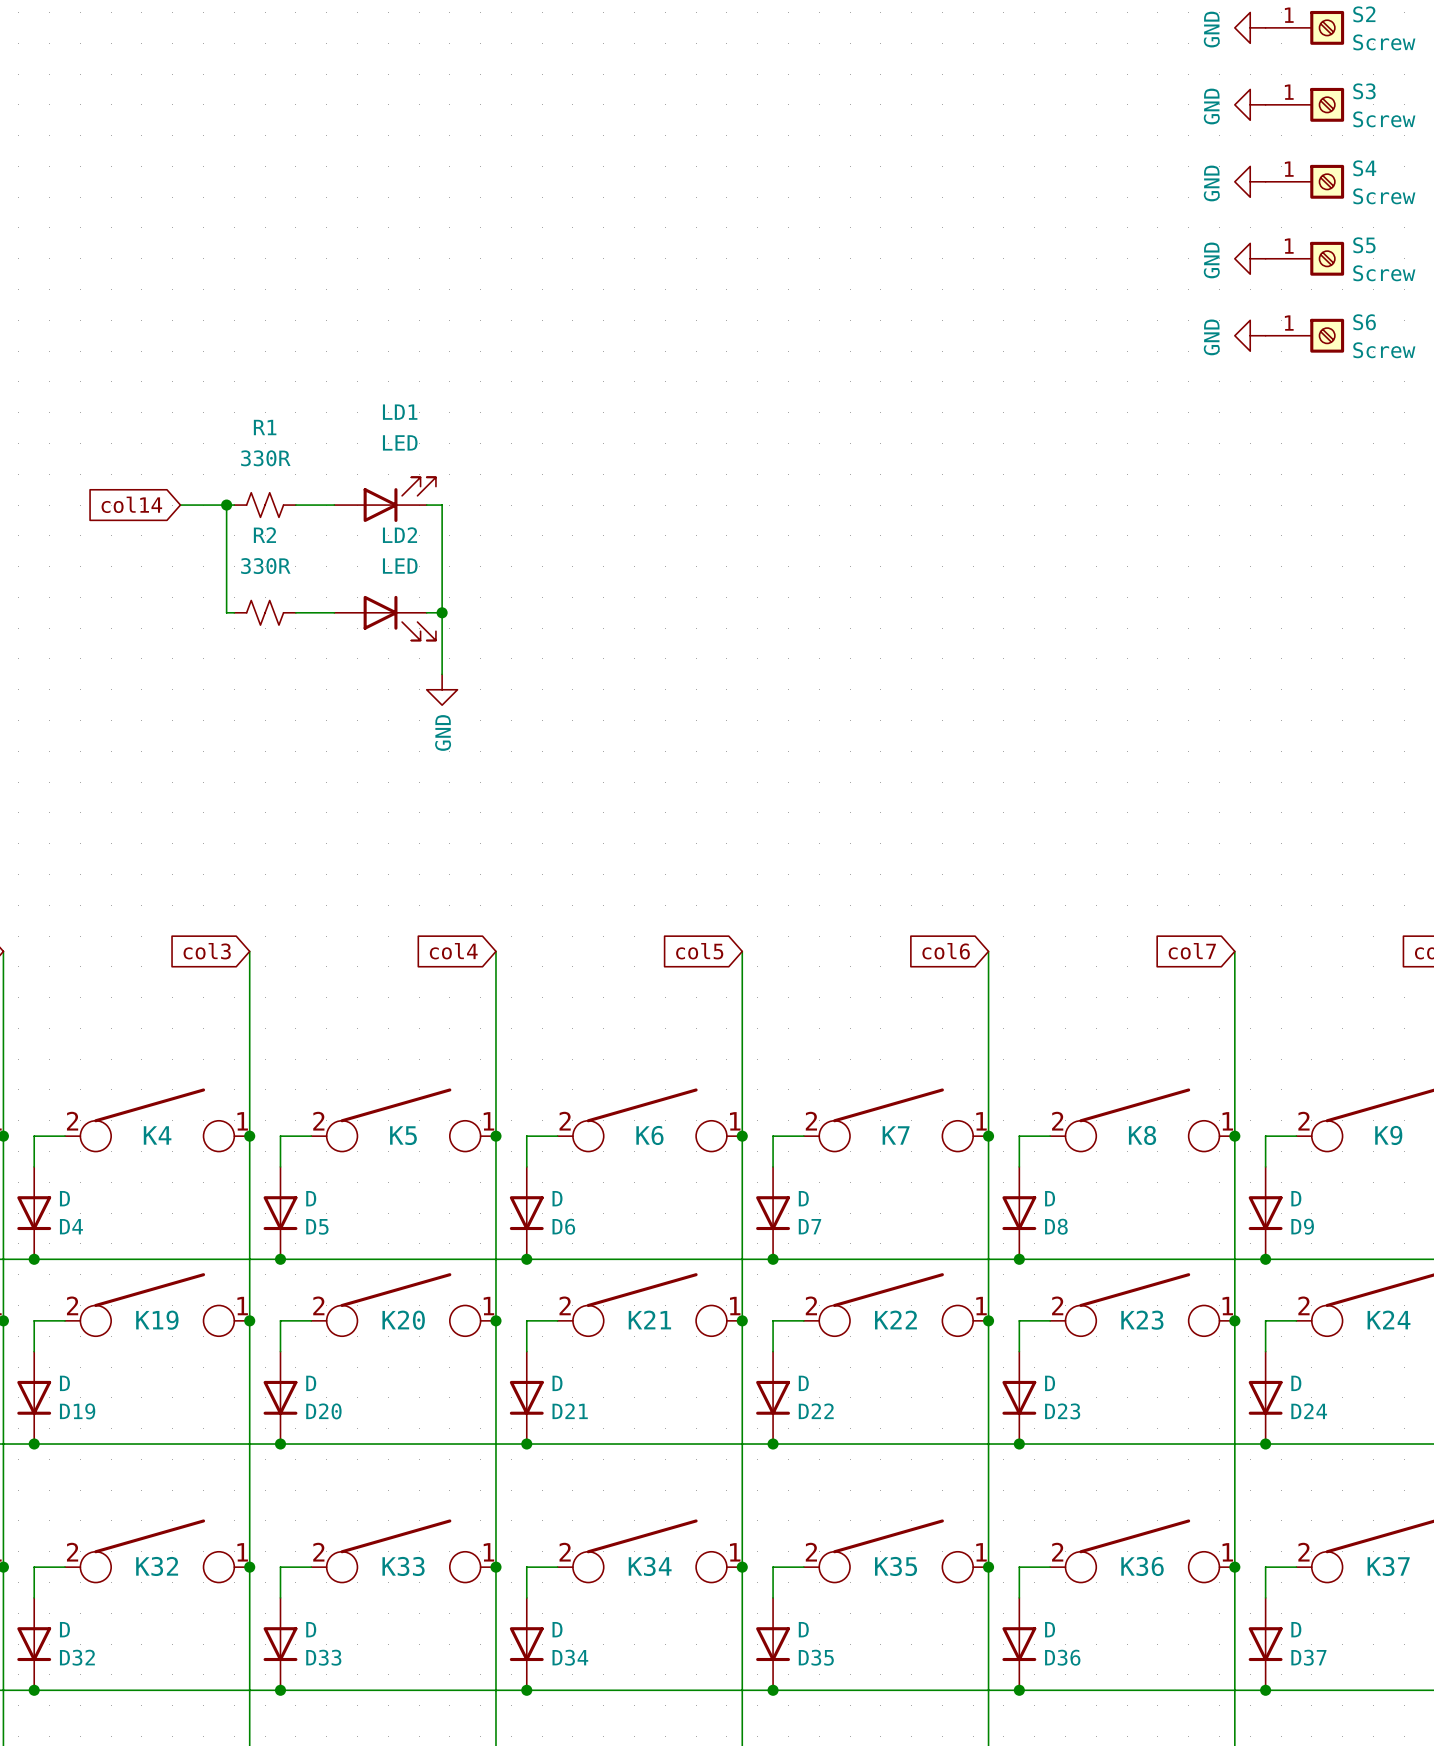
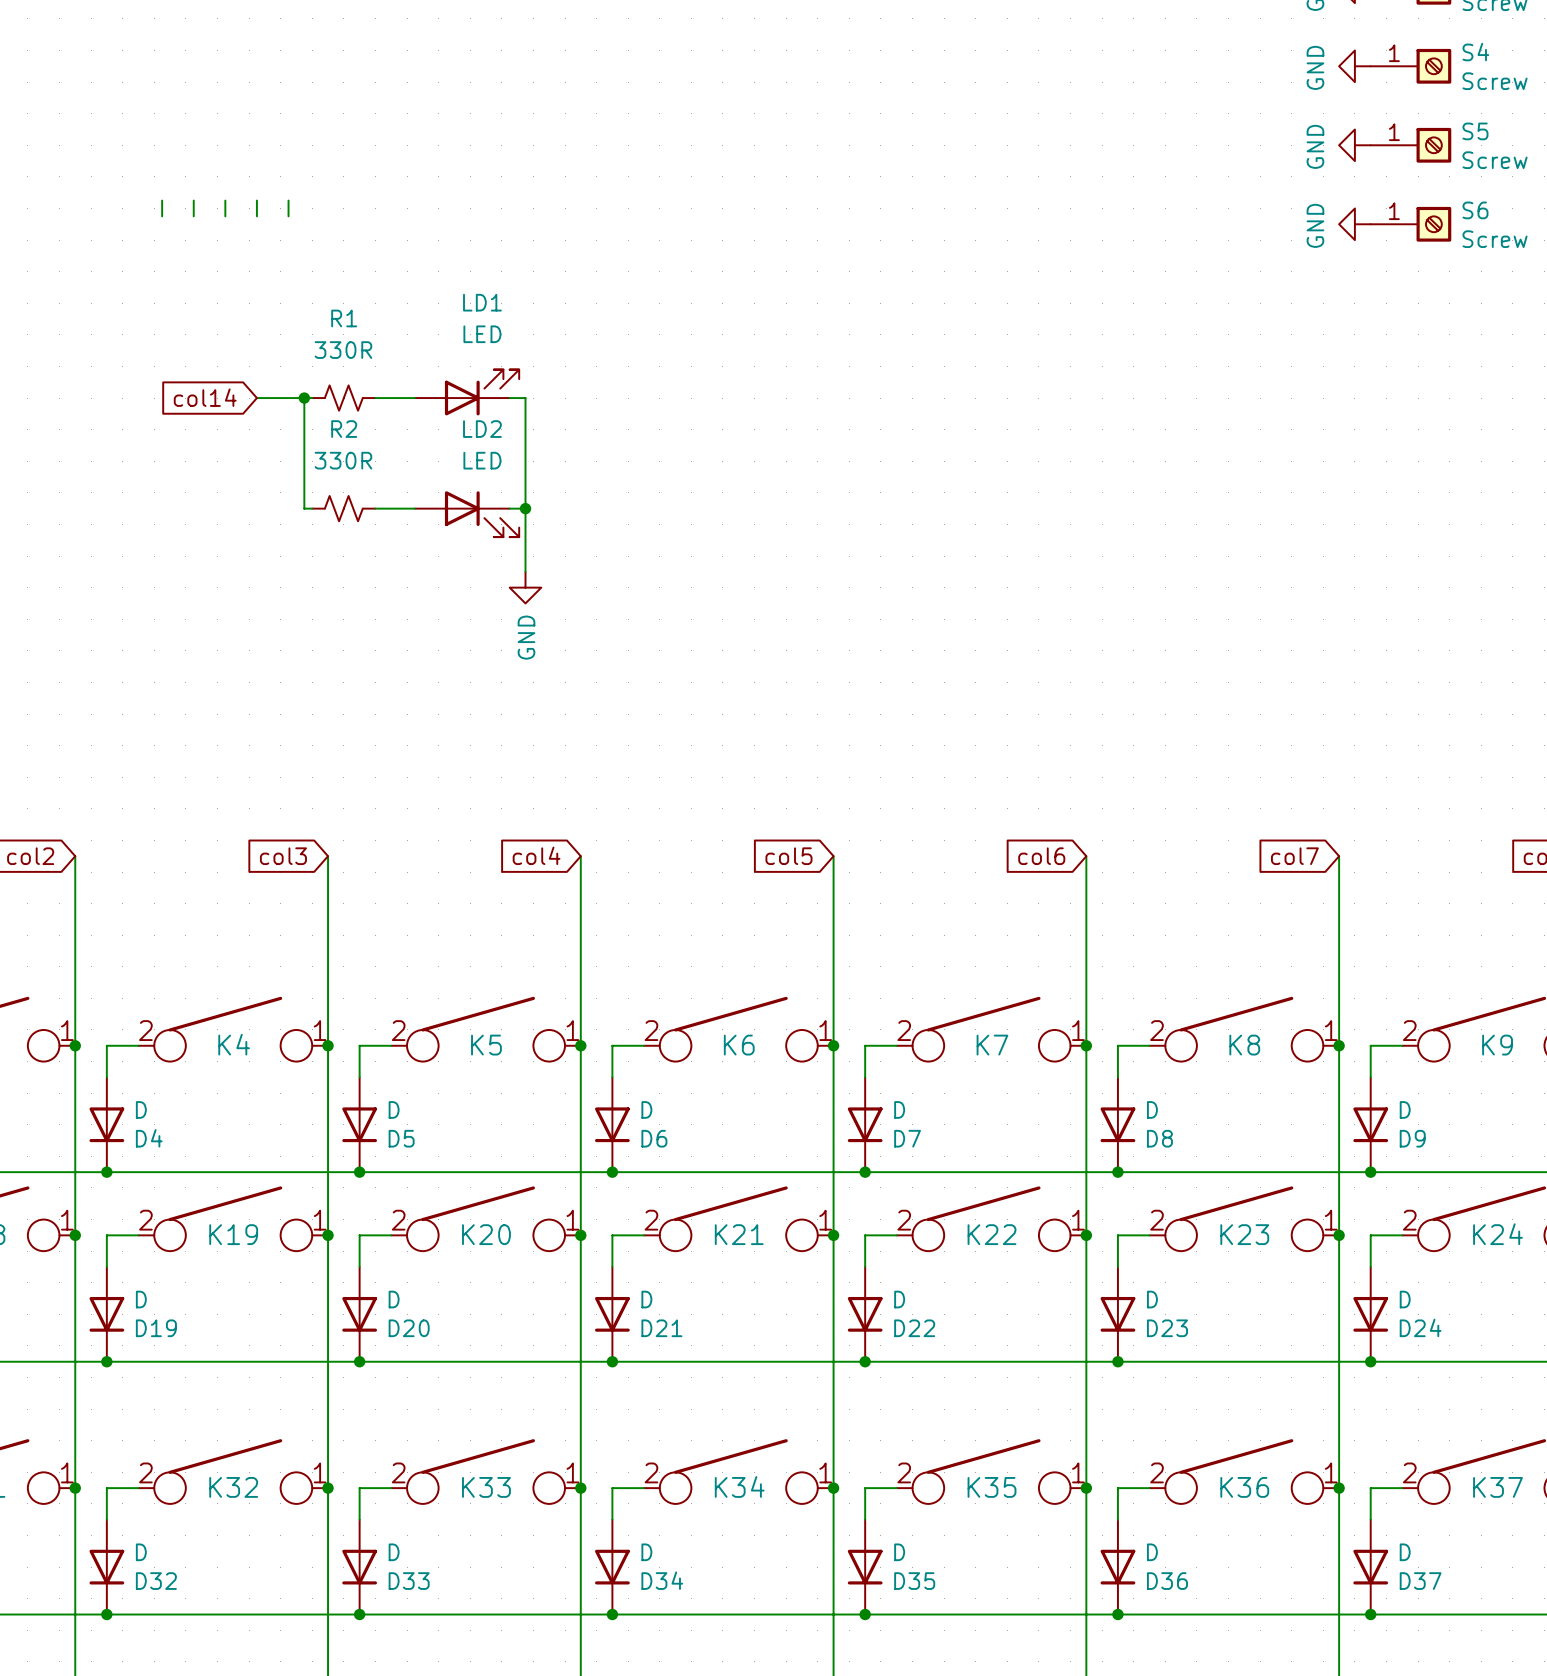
wire: none -> (162, 200) (162, 216)
wire: none -> (193, 200) (193, 216)
wire: none -> (225, 200) (225, 216)
wire: none -> (256, 200) (256, 216)
wire: none -> (288, 200) (288, 216)

